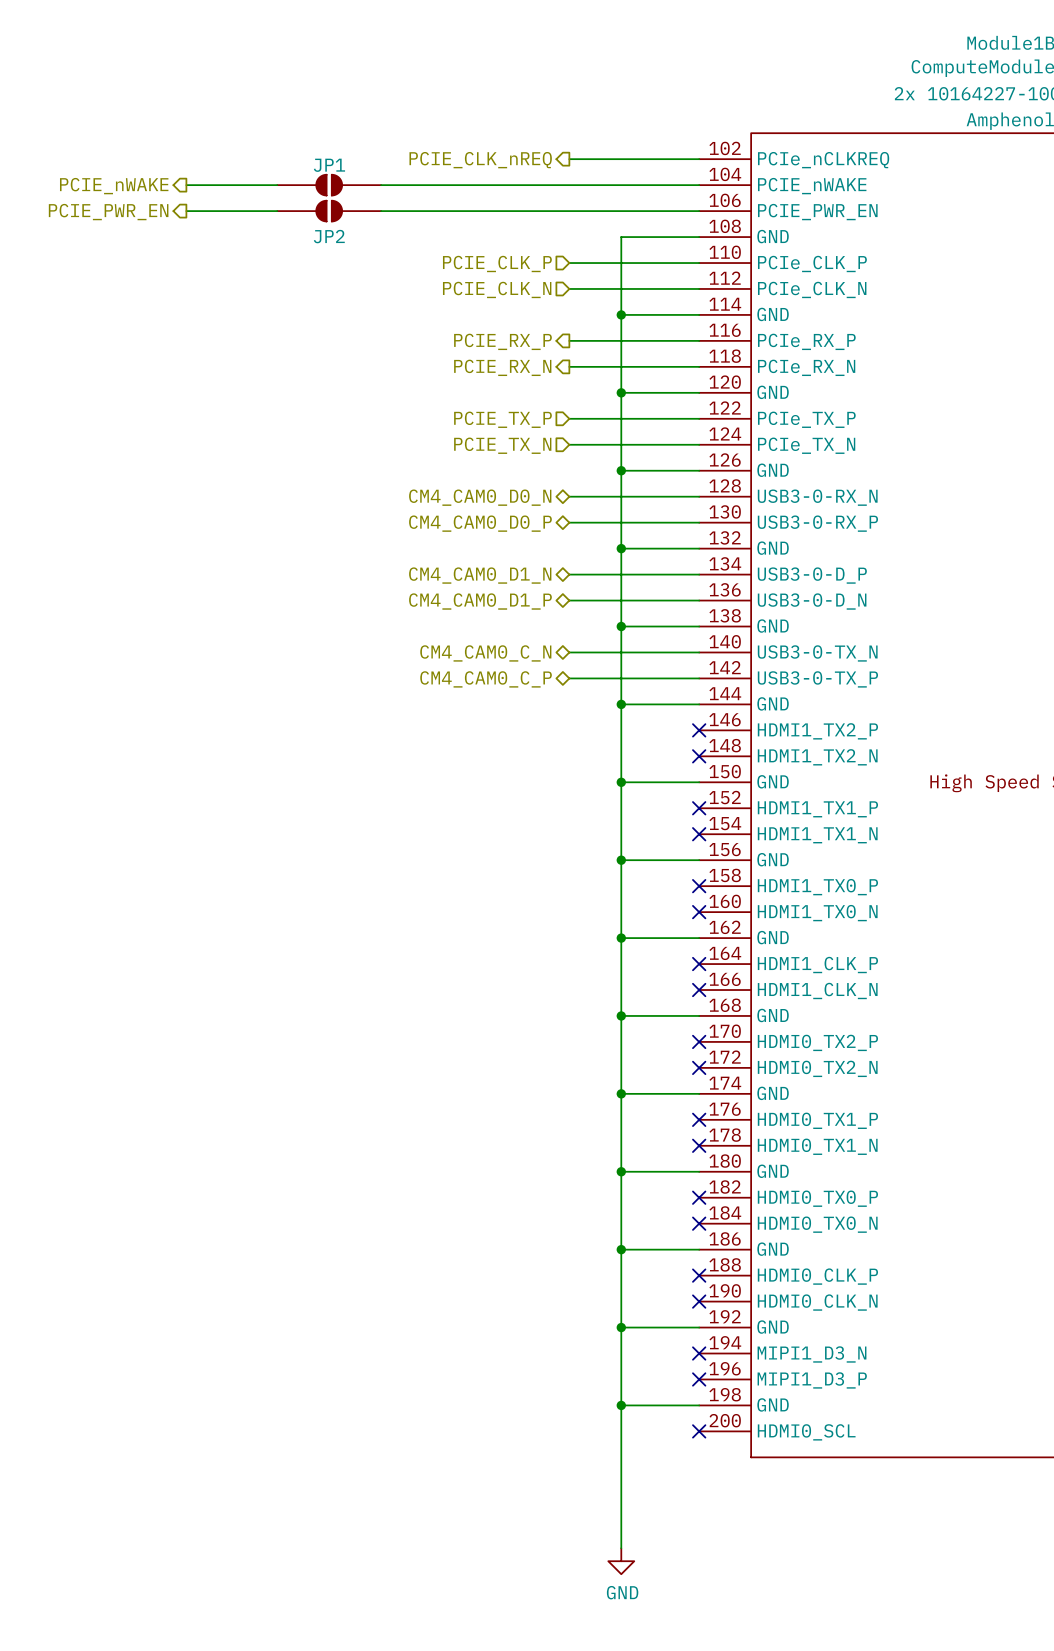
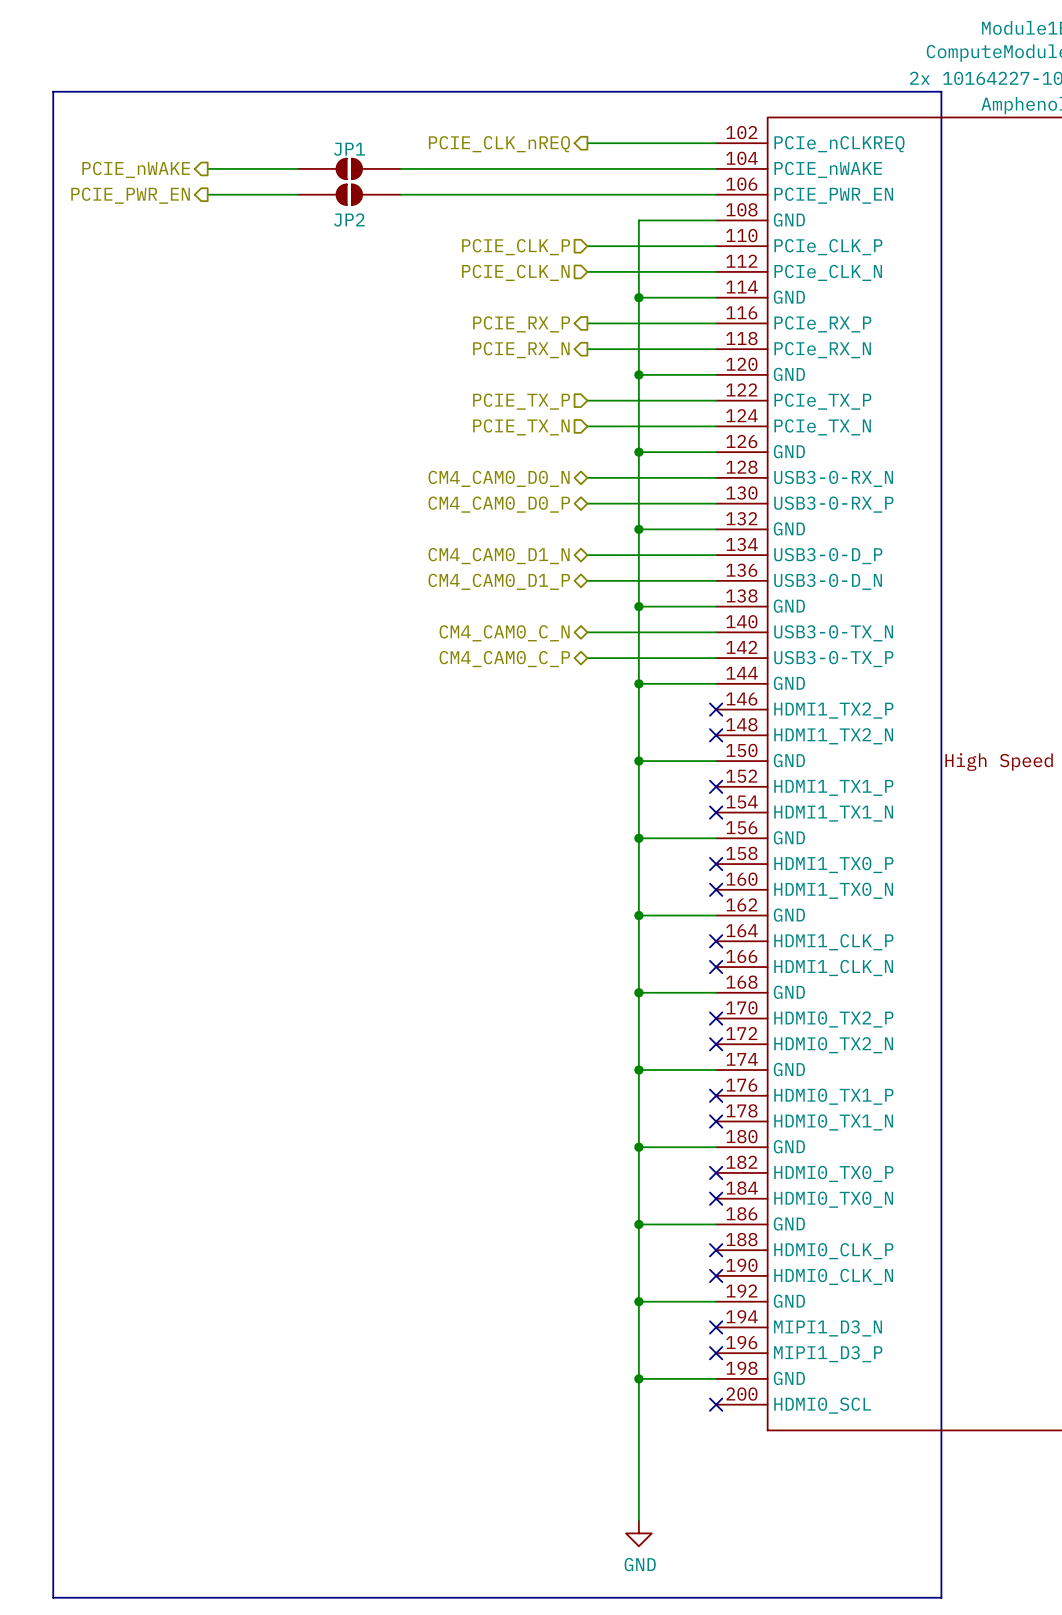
line: none -> (53, 91) (941, 91) (941, 1597) (53, 1597) (53, 91)

